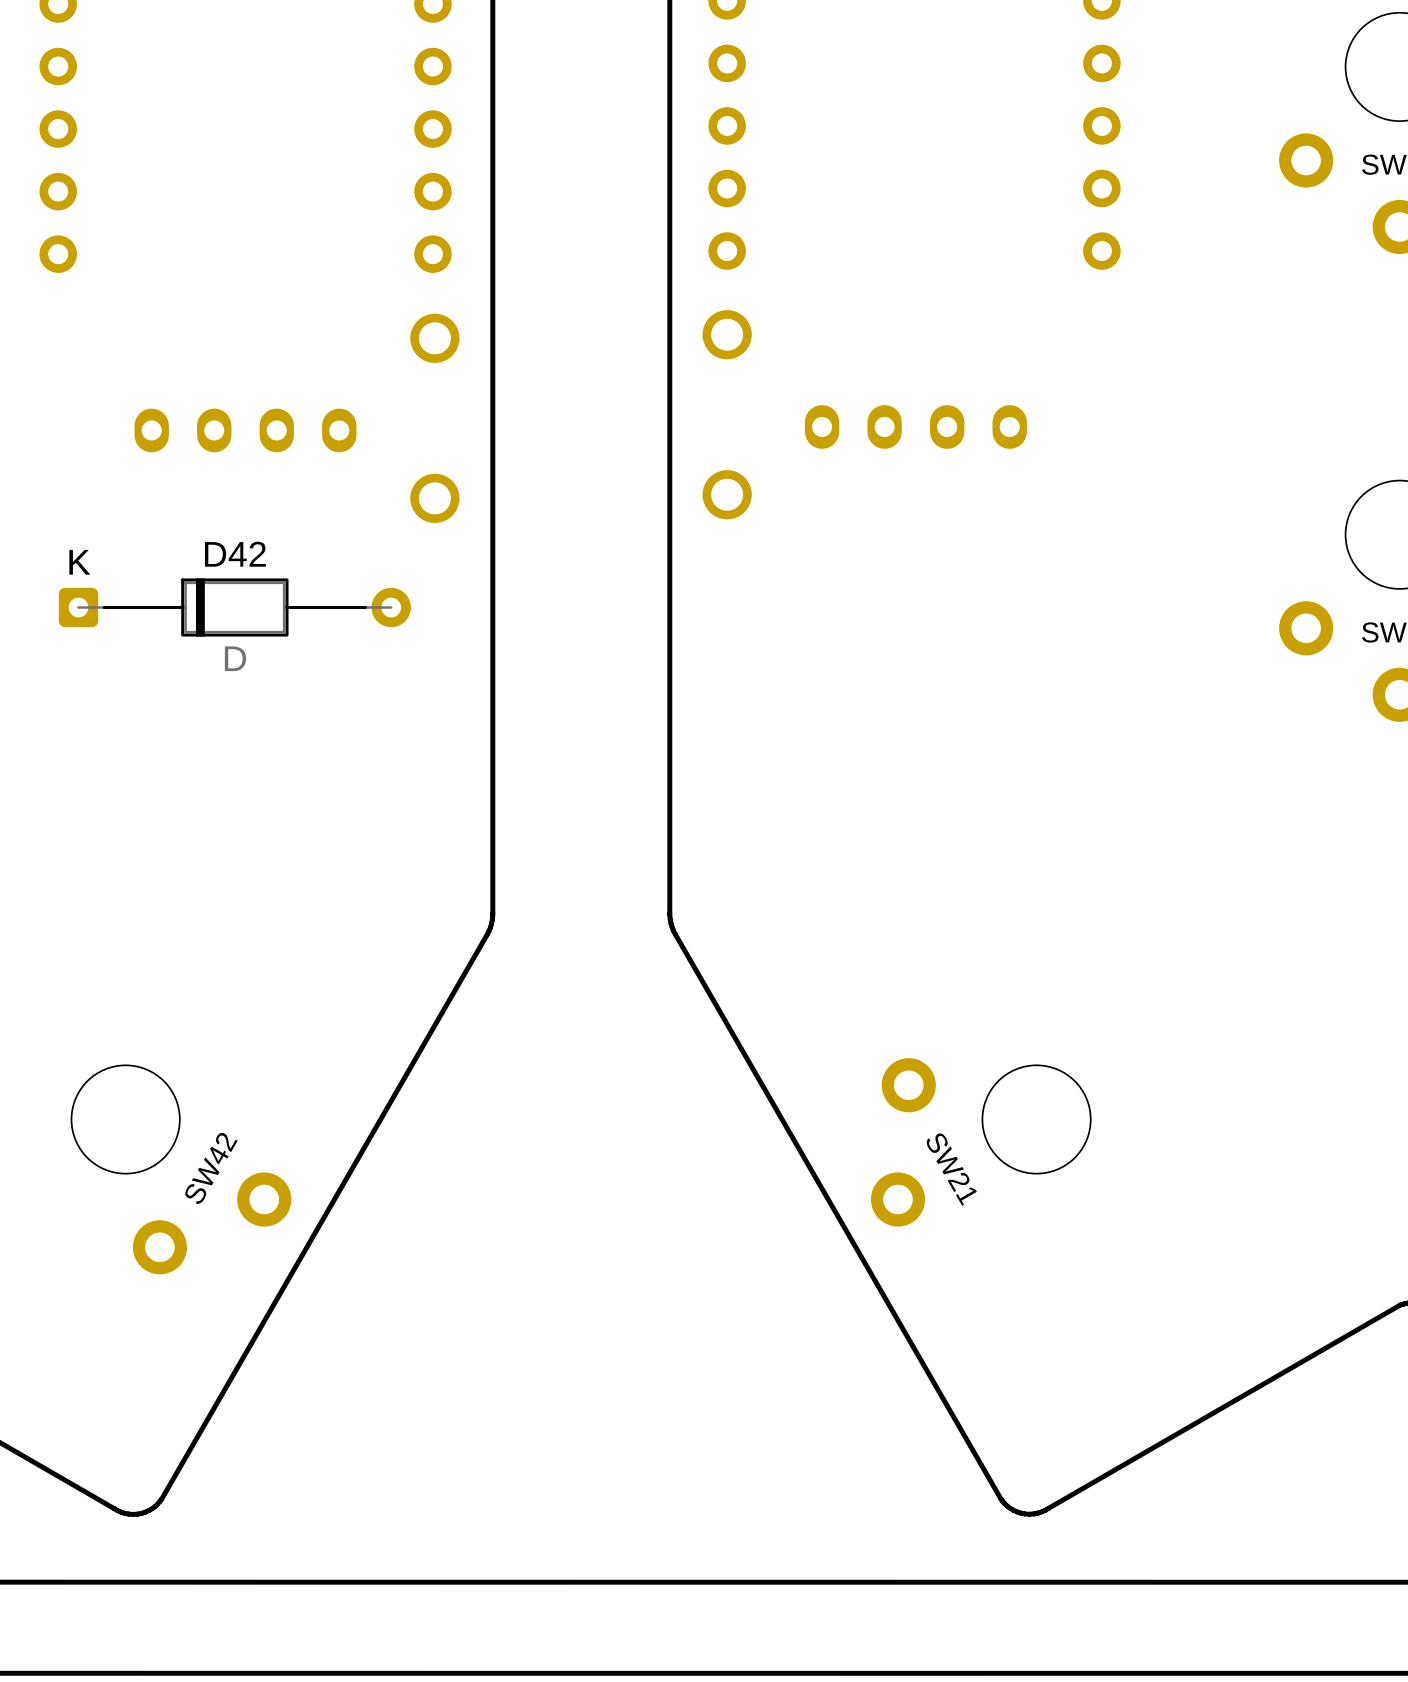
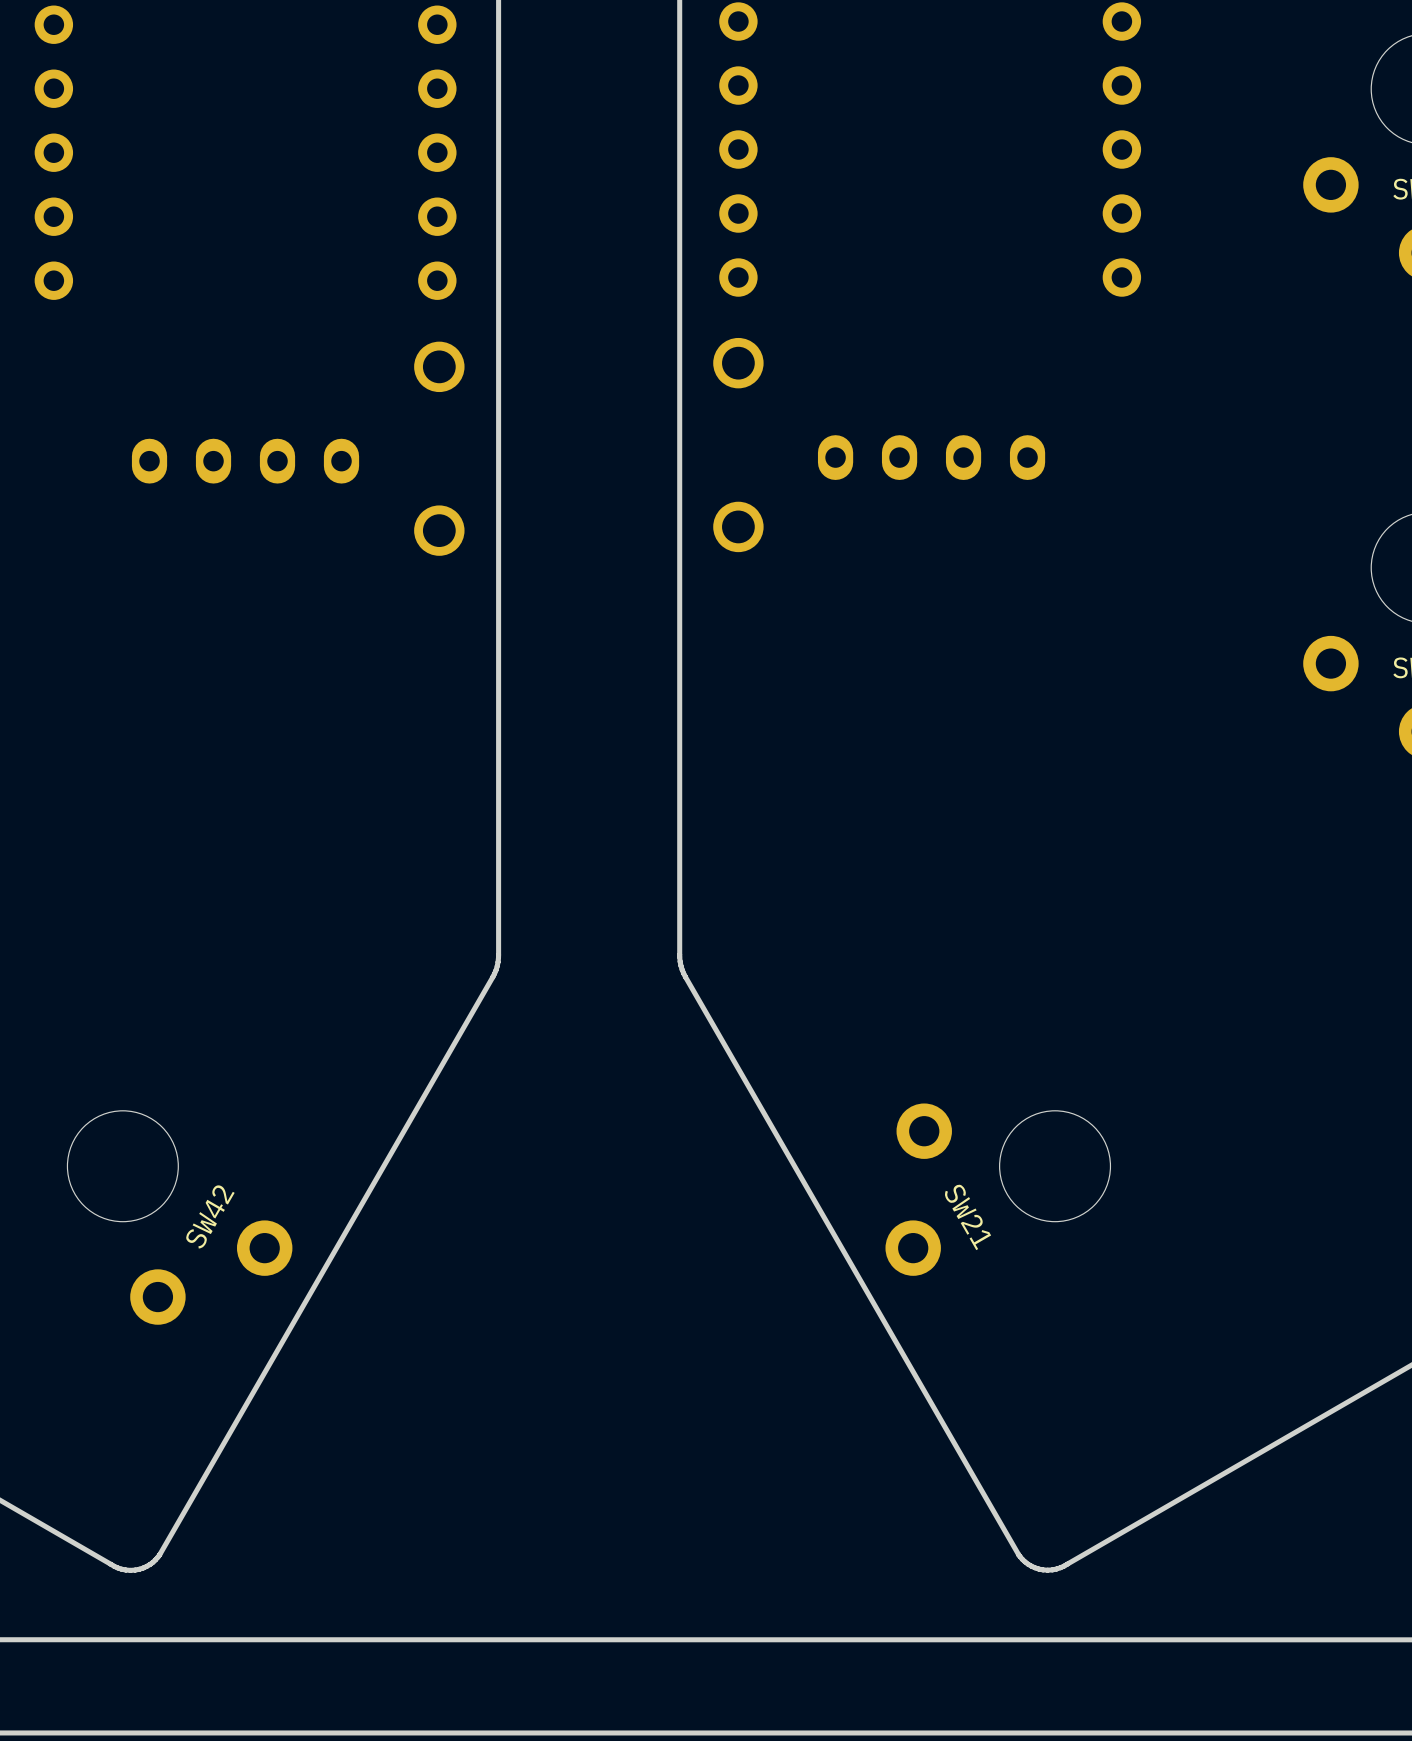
D42: D (234, 607) -> none

